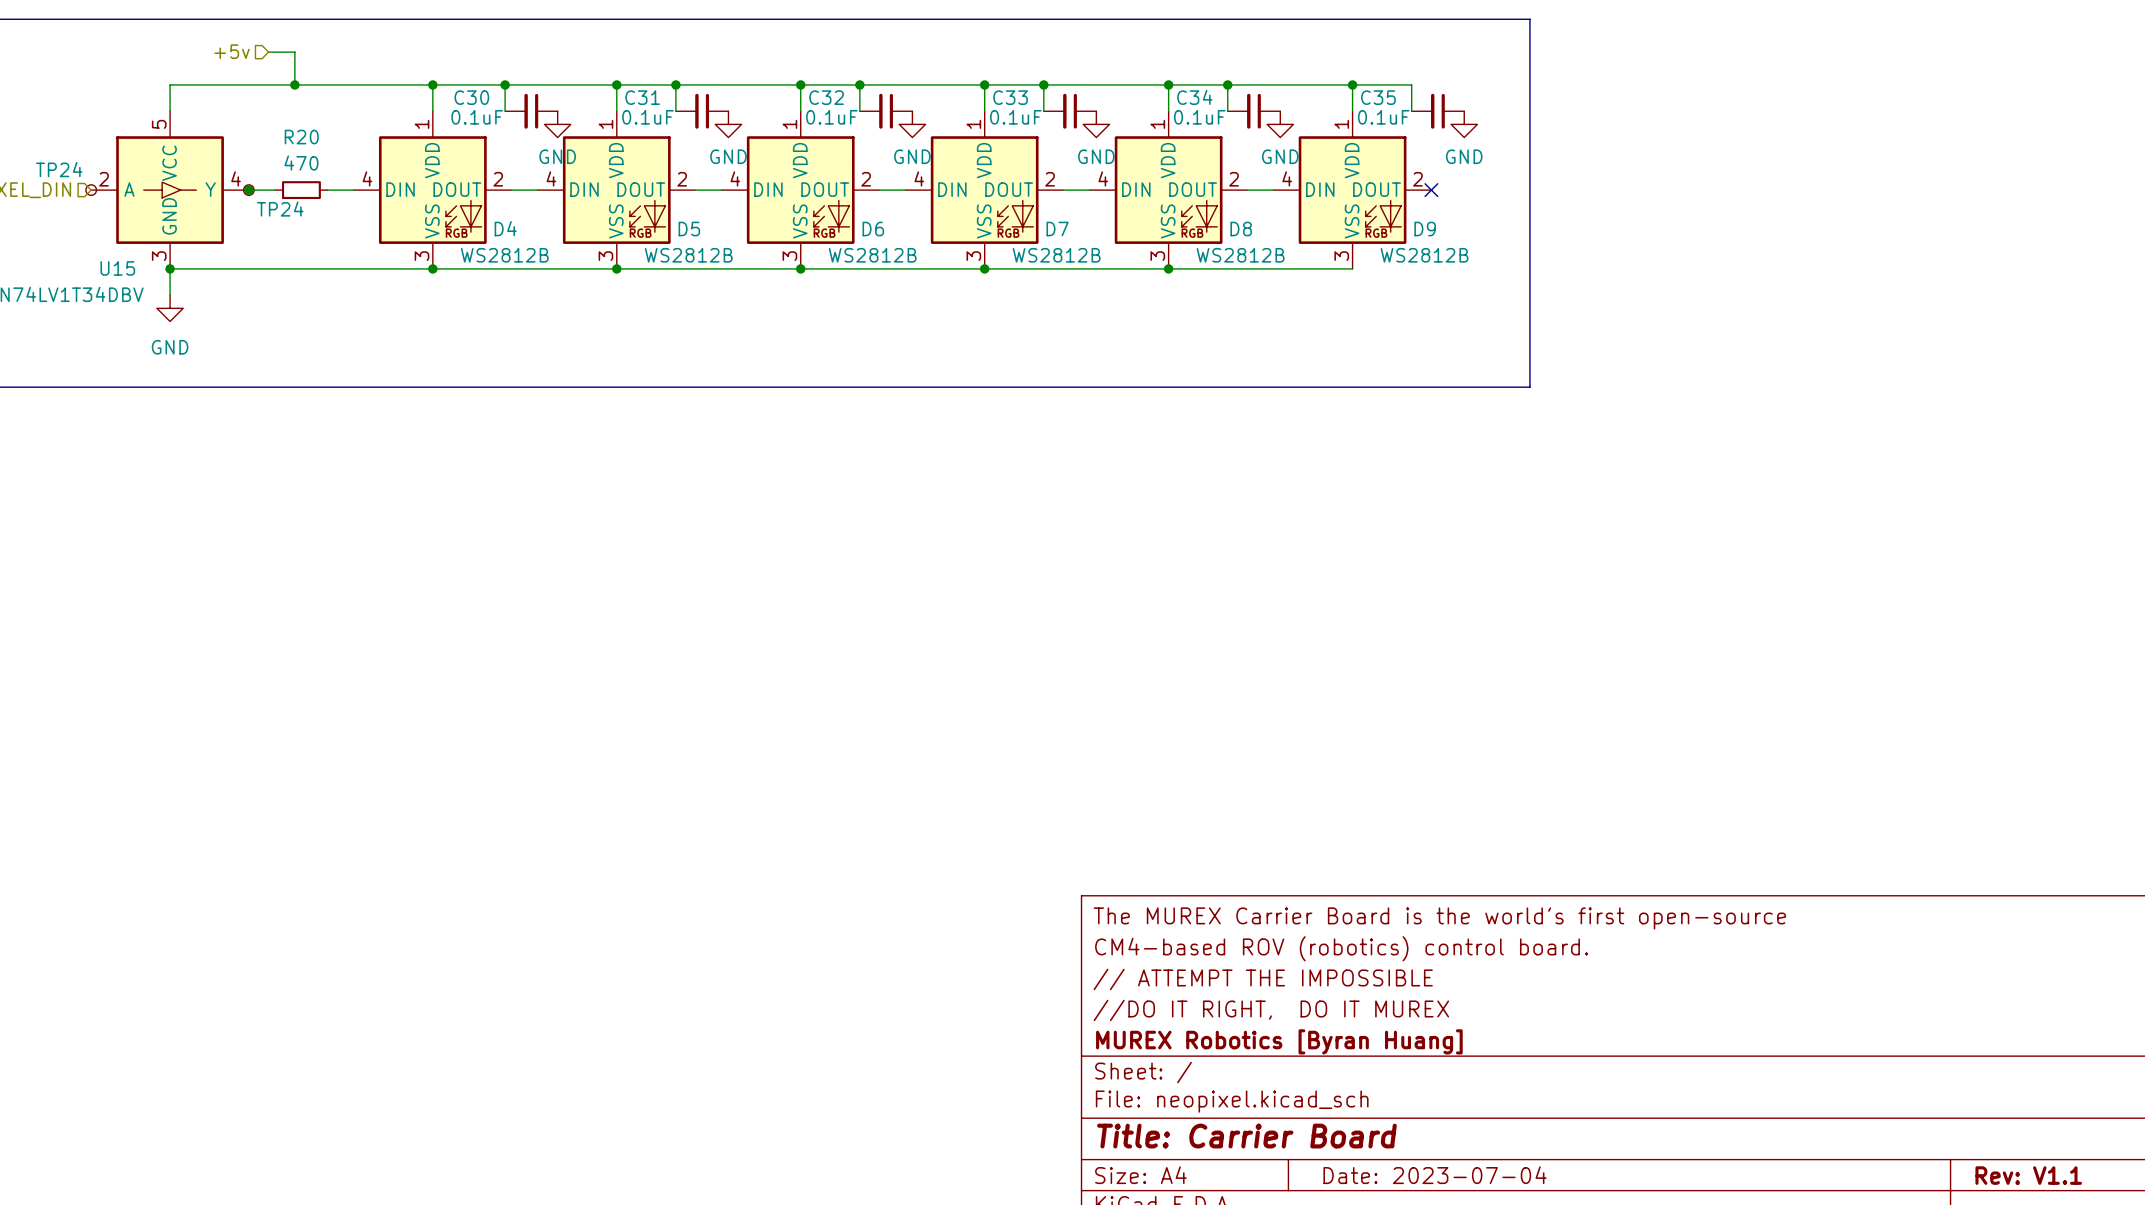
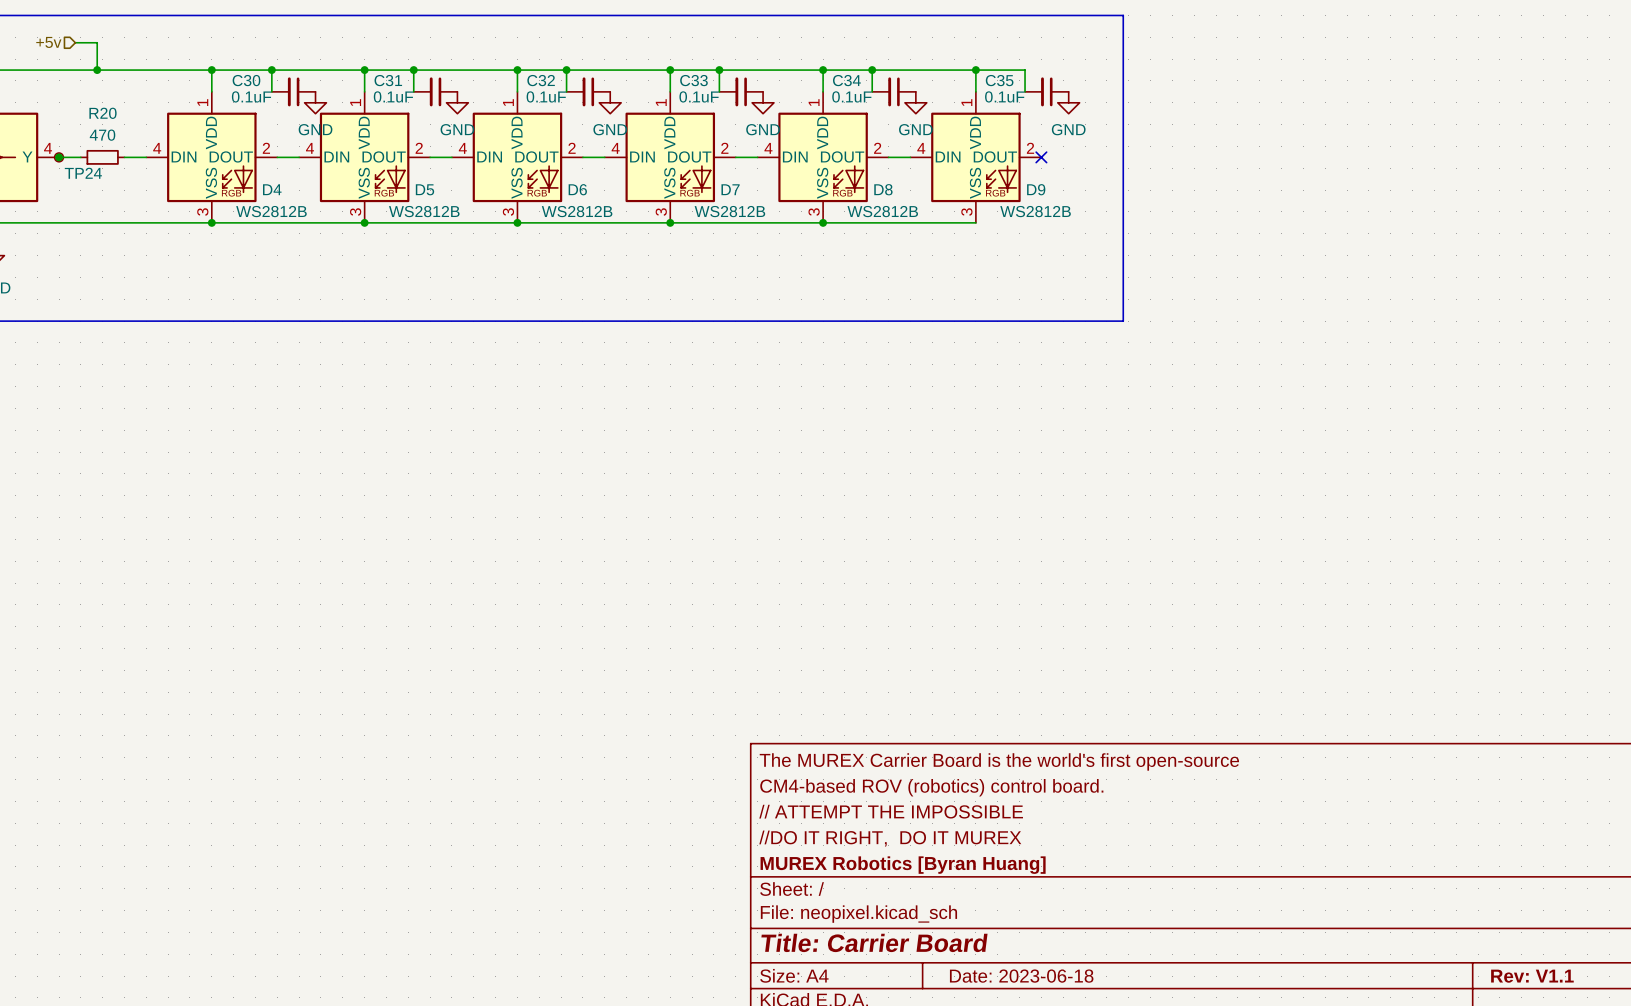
title block: Date: 2023-07-04 (1435, 1175) -> Date: 2023-06-18 (1021, 976)

